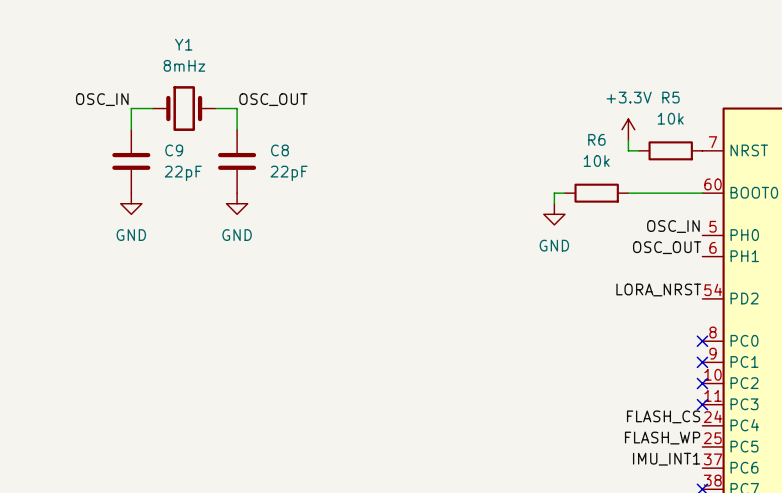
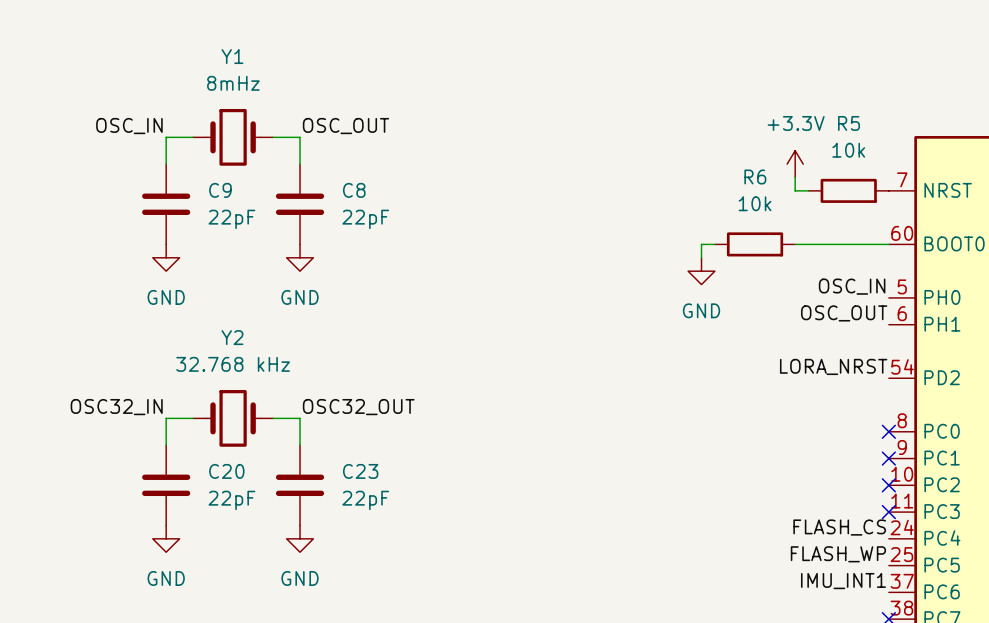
label: none -> OSC32_IN (116, 407)
label: none -> OSC32_OUT (358, 407)
wire: none -> (192, 418) (166, 418) (166, 445)
Y2: none -> 32.768 kHz (233, 418)
wire: none -> (273, 418) (300, 418) (300, 445)
C20: none -> 22pF (166, 485)
C23: none -> 22pF (300, 485)
power symbol: none -> GND (166, 538)
power symbol: none -> GND (300, 538)

